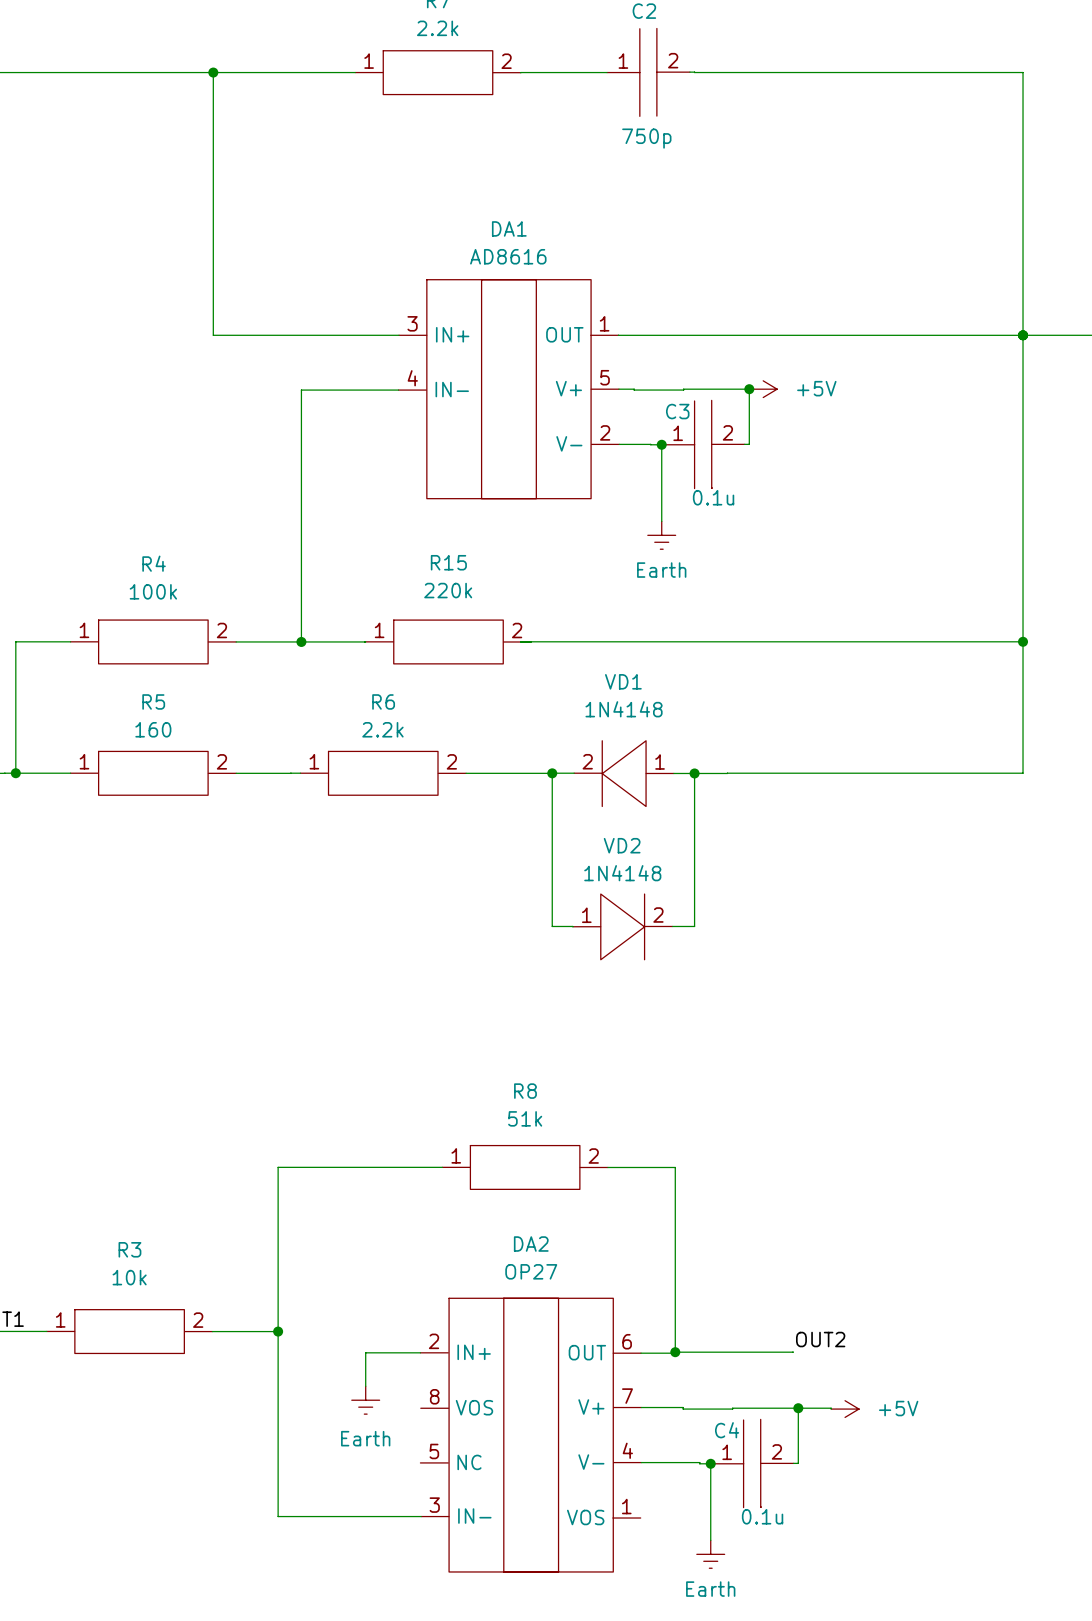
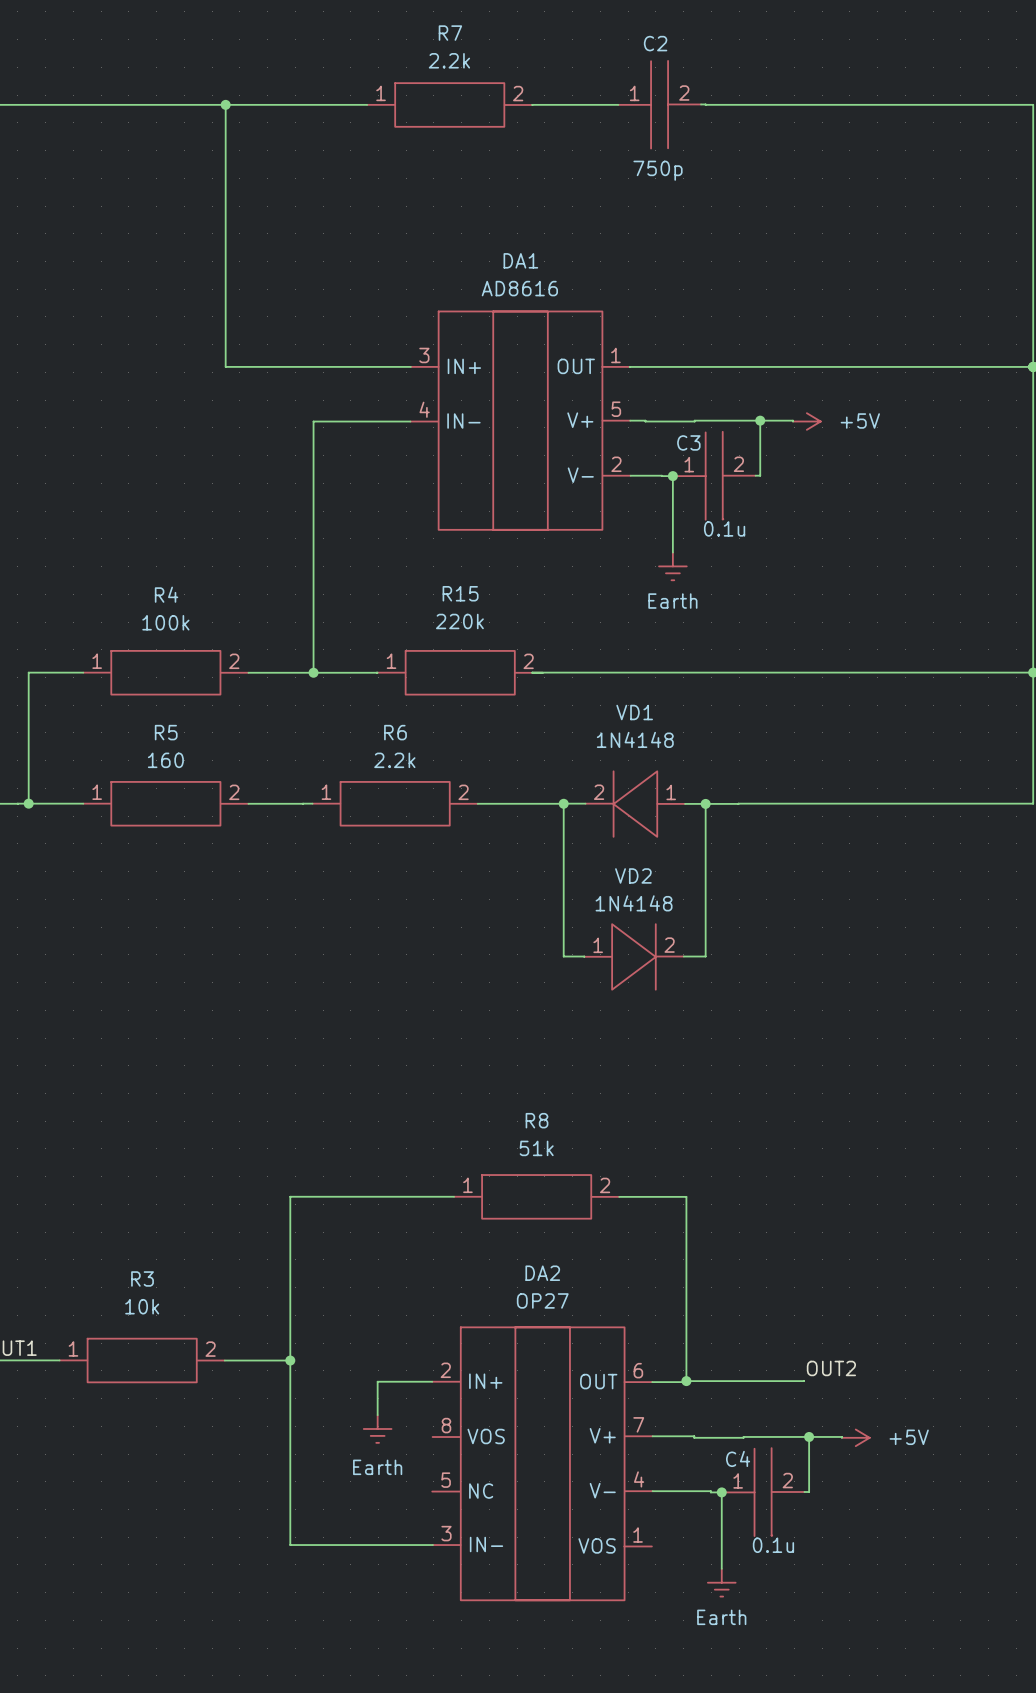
power symbol position: +5V (763, 389) -> +5V (806, 421)

